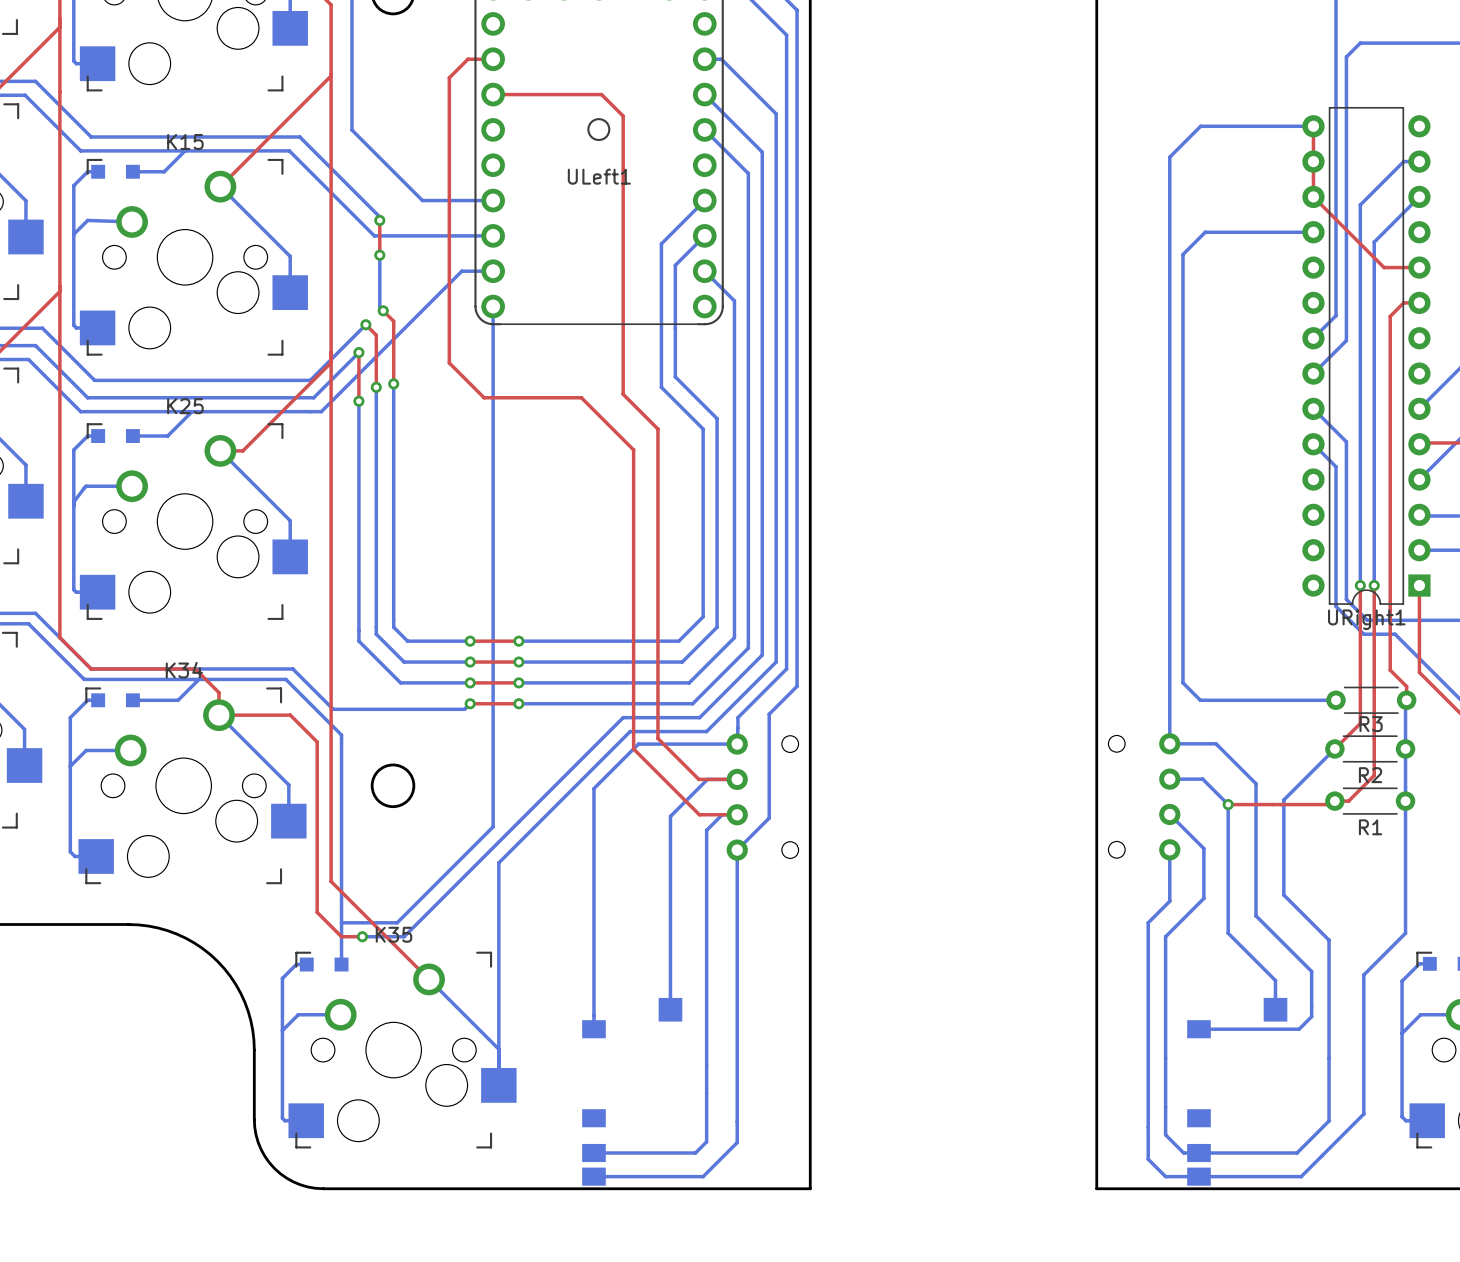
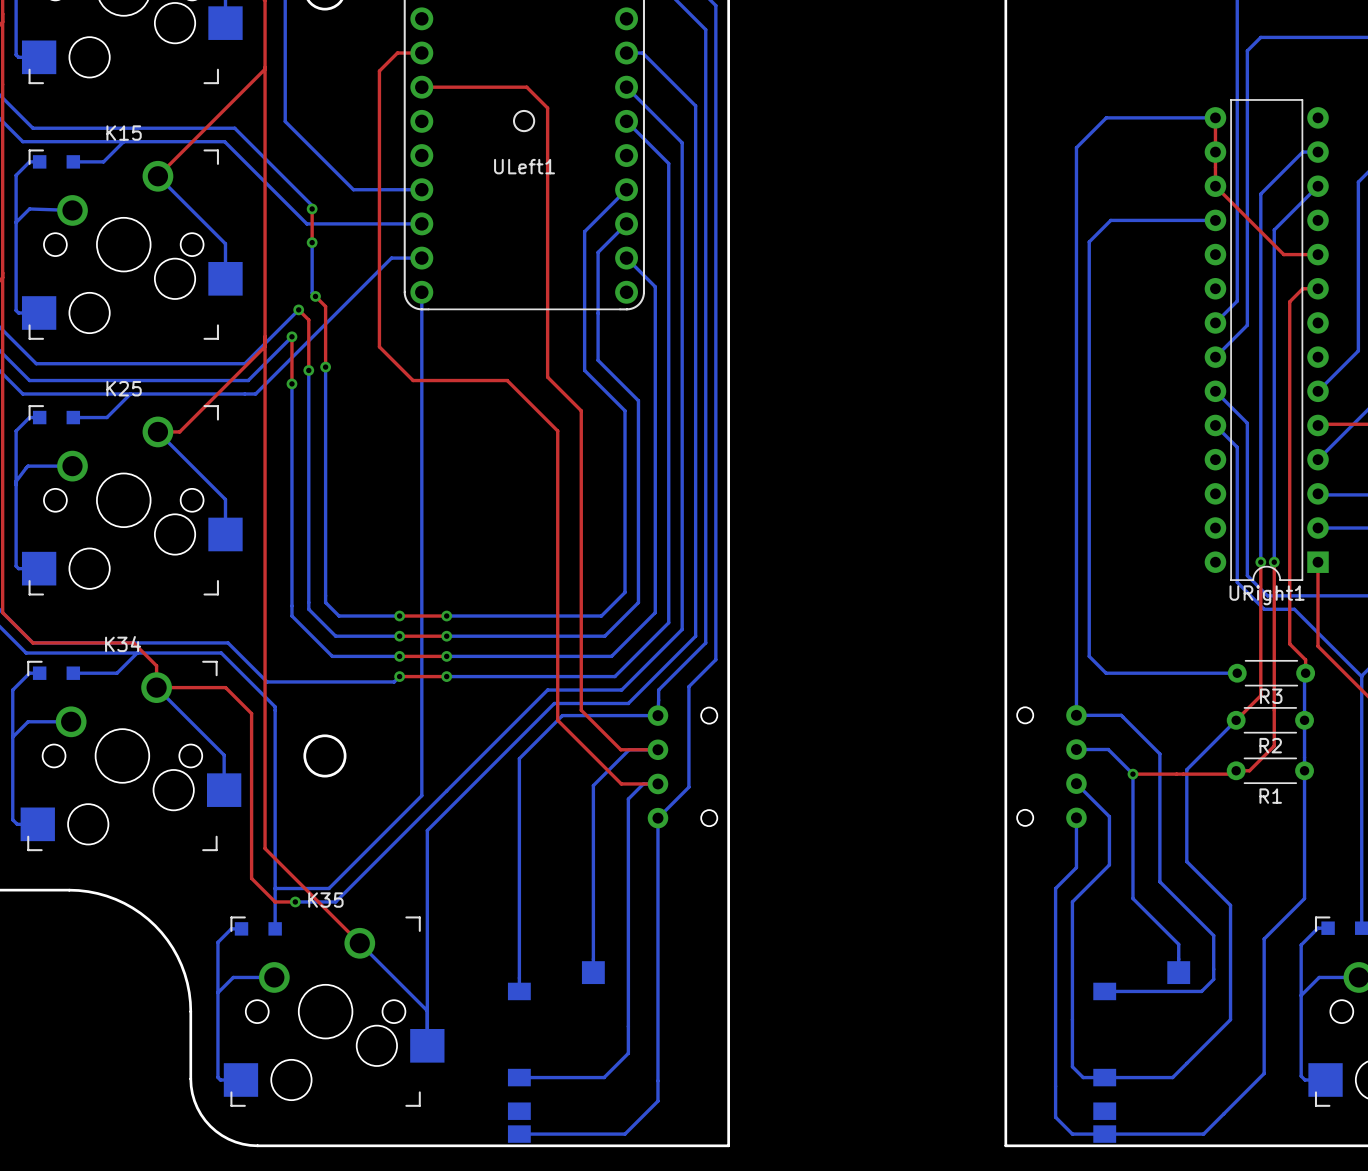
bottom track: (1329, 1058) (1329, 1121) (1297, 1153) (1183, 1153) (1165, 1134) (1165, 1107) -> (1230, 1019) (1172, 1077) (1083, 1077) (1072, 1066)
bottom track: (706, 1093) (706, 1141) (695, 1153) (593, 1153) -> (628, 1053) (604, 1077) (519, 1077)

